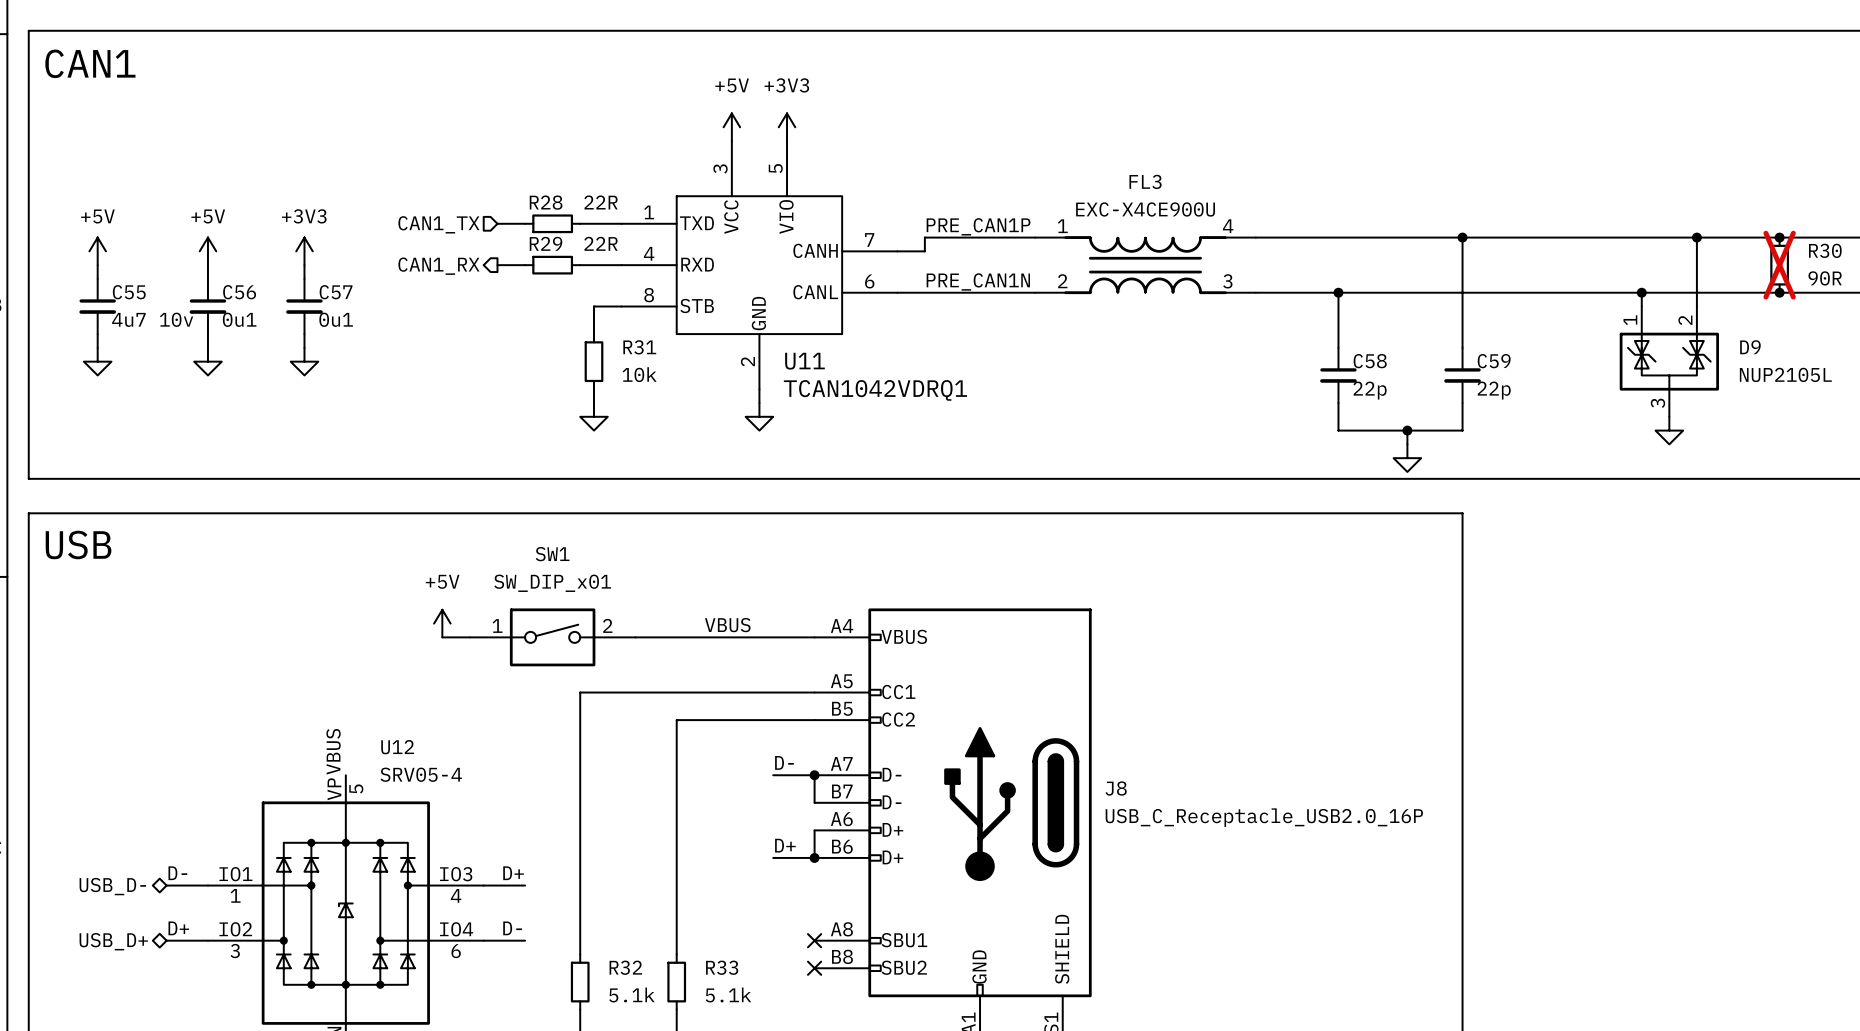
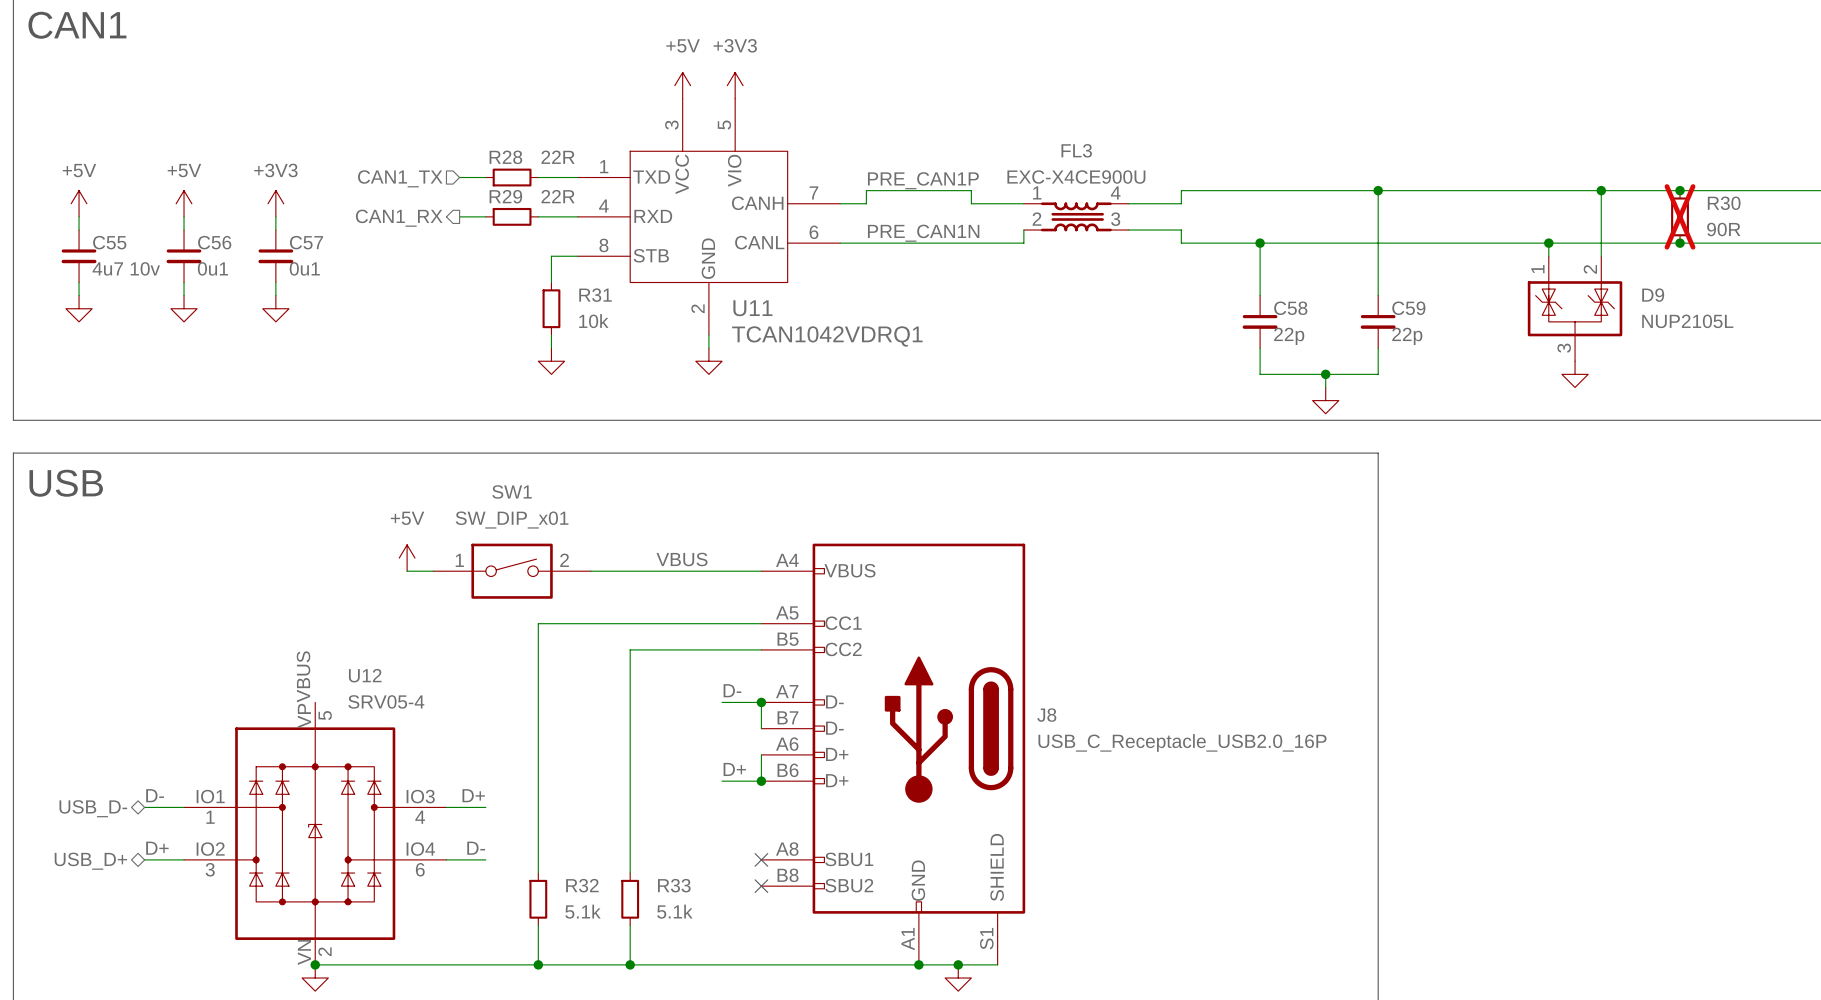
FL3 symbol: [1035, 236, 1256, 295] -> [1023, 202, 1129, 232]
wire: none -> (971, 190) (971, 203) (1023, 203)
wire: none -> (1181, 190) (1181, 203) (1128, 203)
wire: none -> (1128, 230) (1181, 230) (1181, 243)

